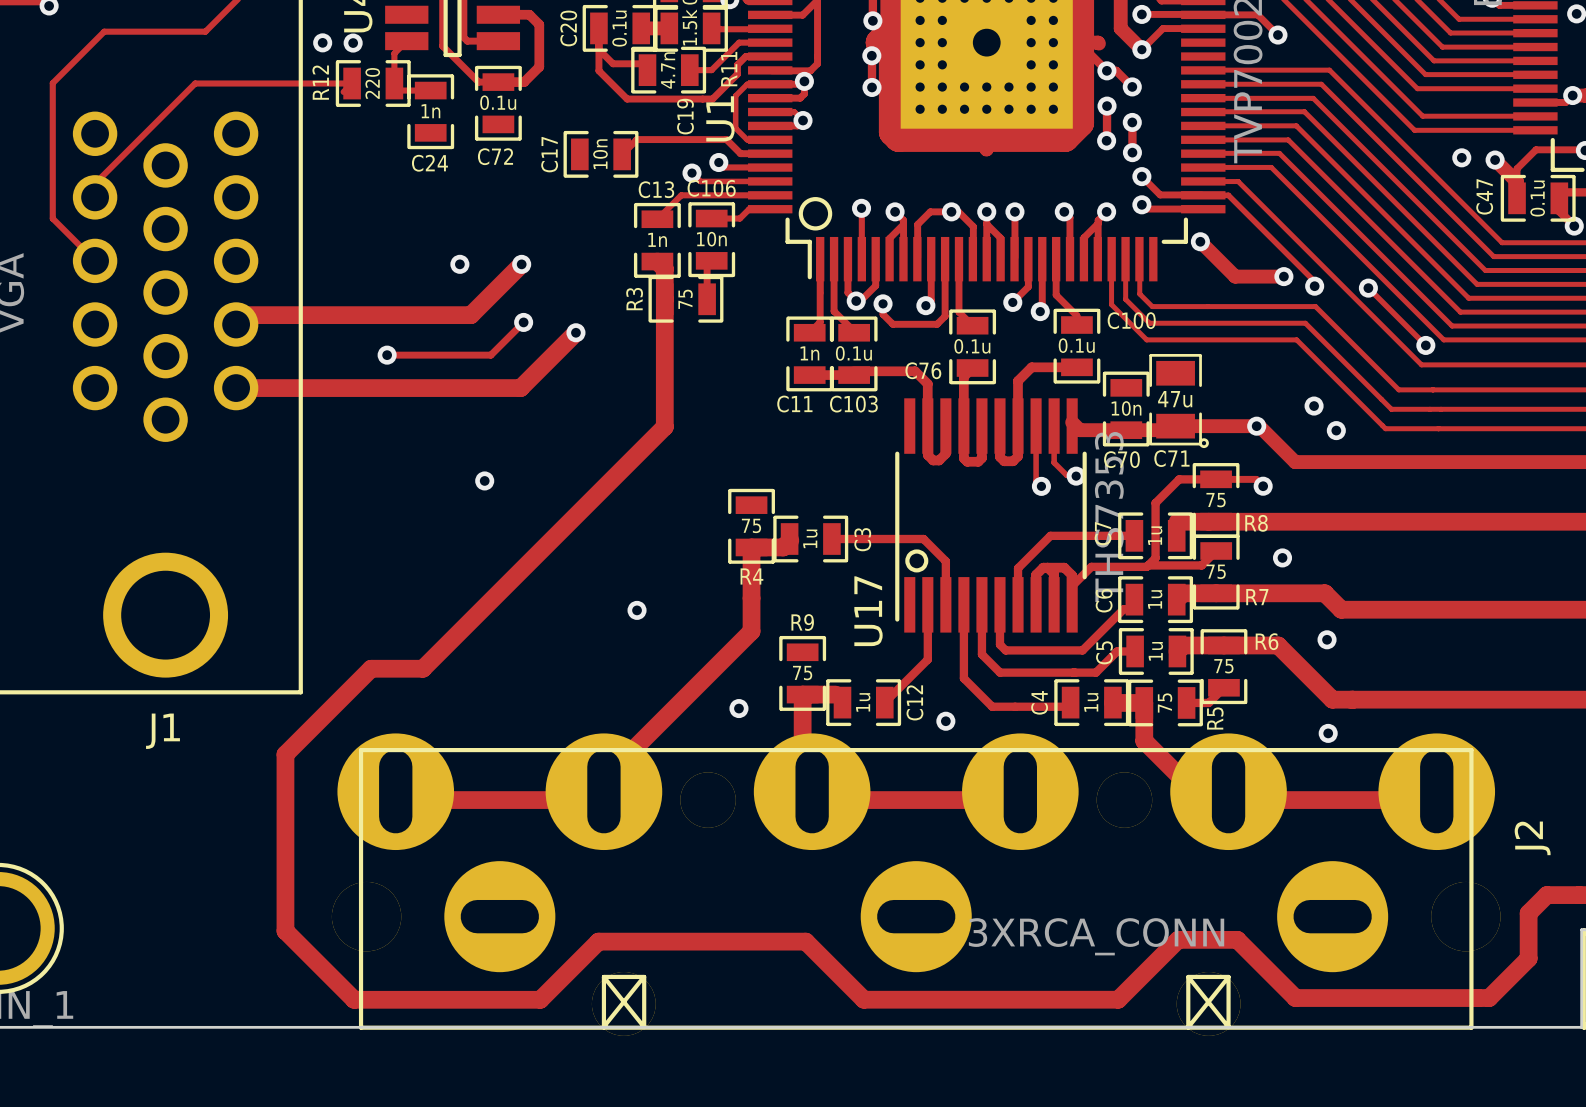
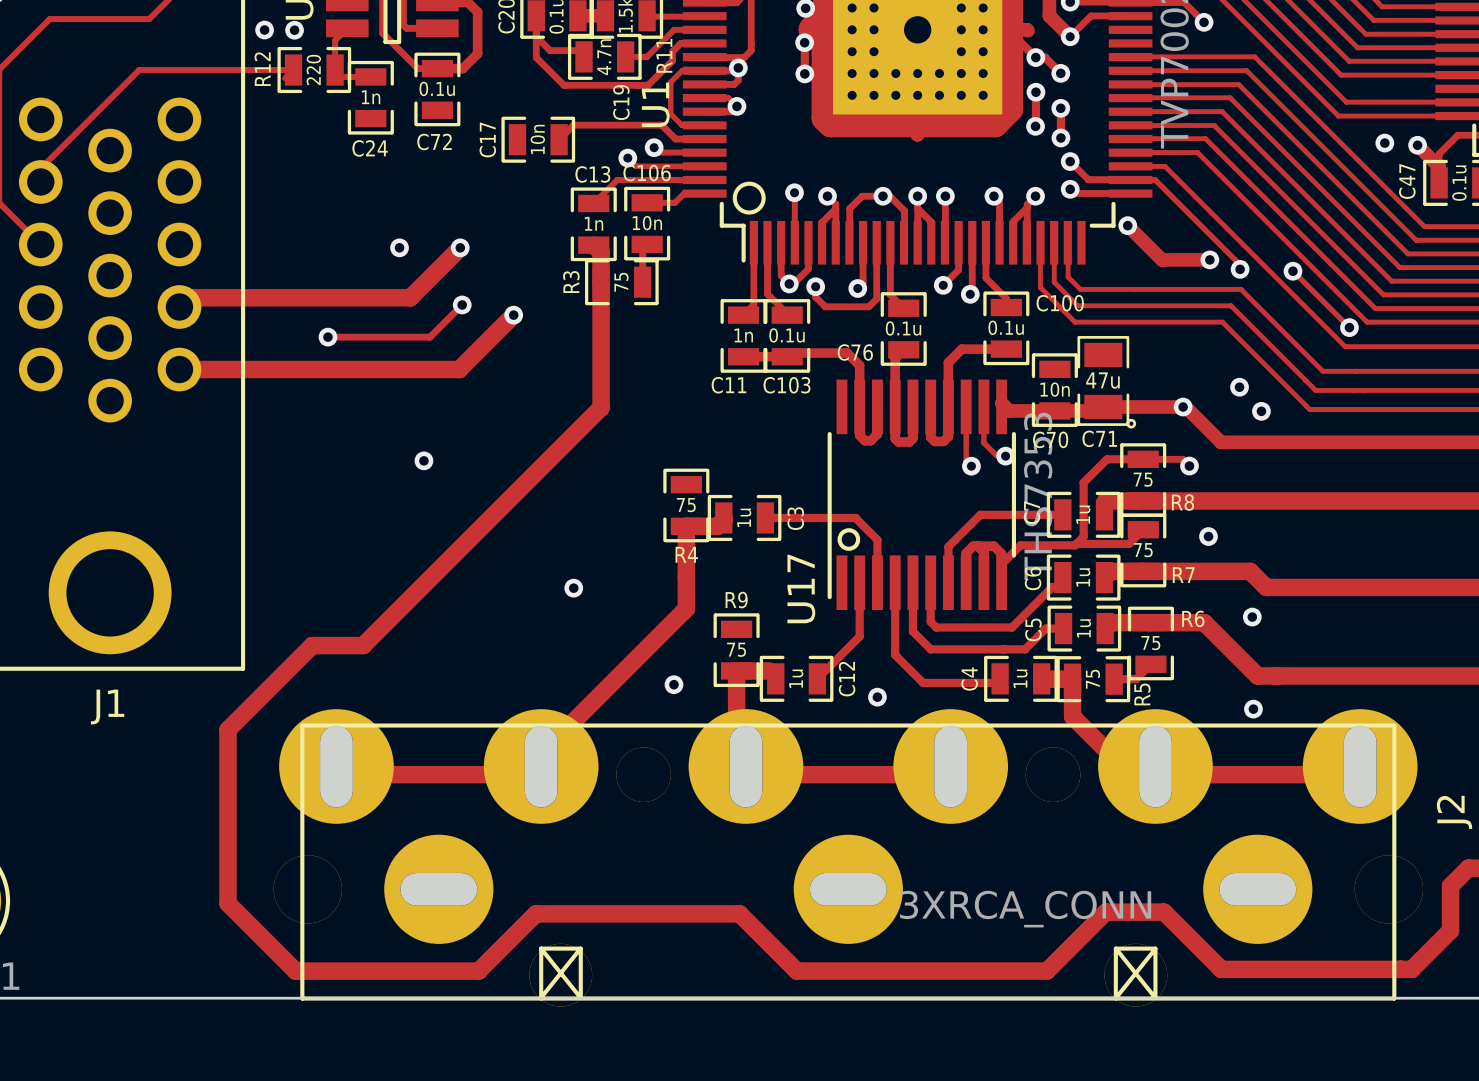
board edge: none -> (336, 741) (336, 791)
board edge: none -> (541, 741) (541, 791)
board edge: none -> (745, 741) (745, 791)
board edge: none -> (950, 741) (950, 791)
board edge: none -> (1155, 741) (1155, 791)
board edge: none -> (1360, 741) (1360, 791)
board edge: none -> (416, 889) (460, 889)
board edge: none -> (826, 889) (870, 889)
board edge: none -> (1235, 889) (1279, 889)

